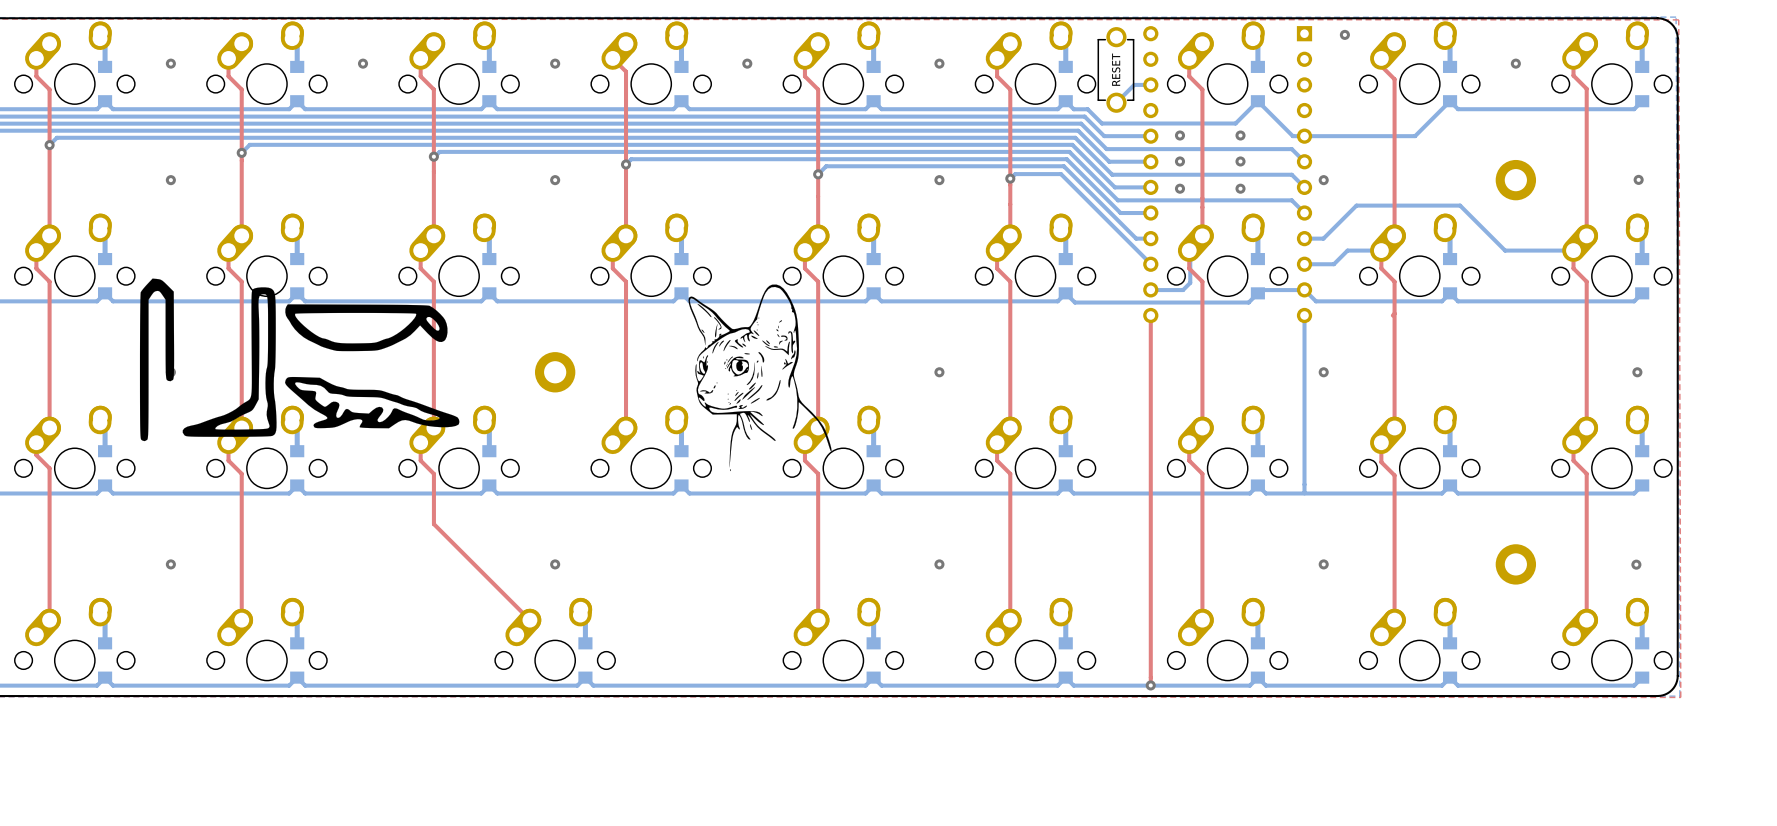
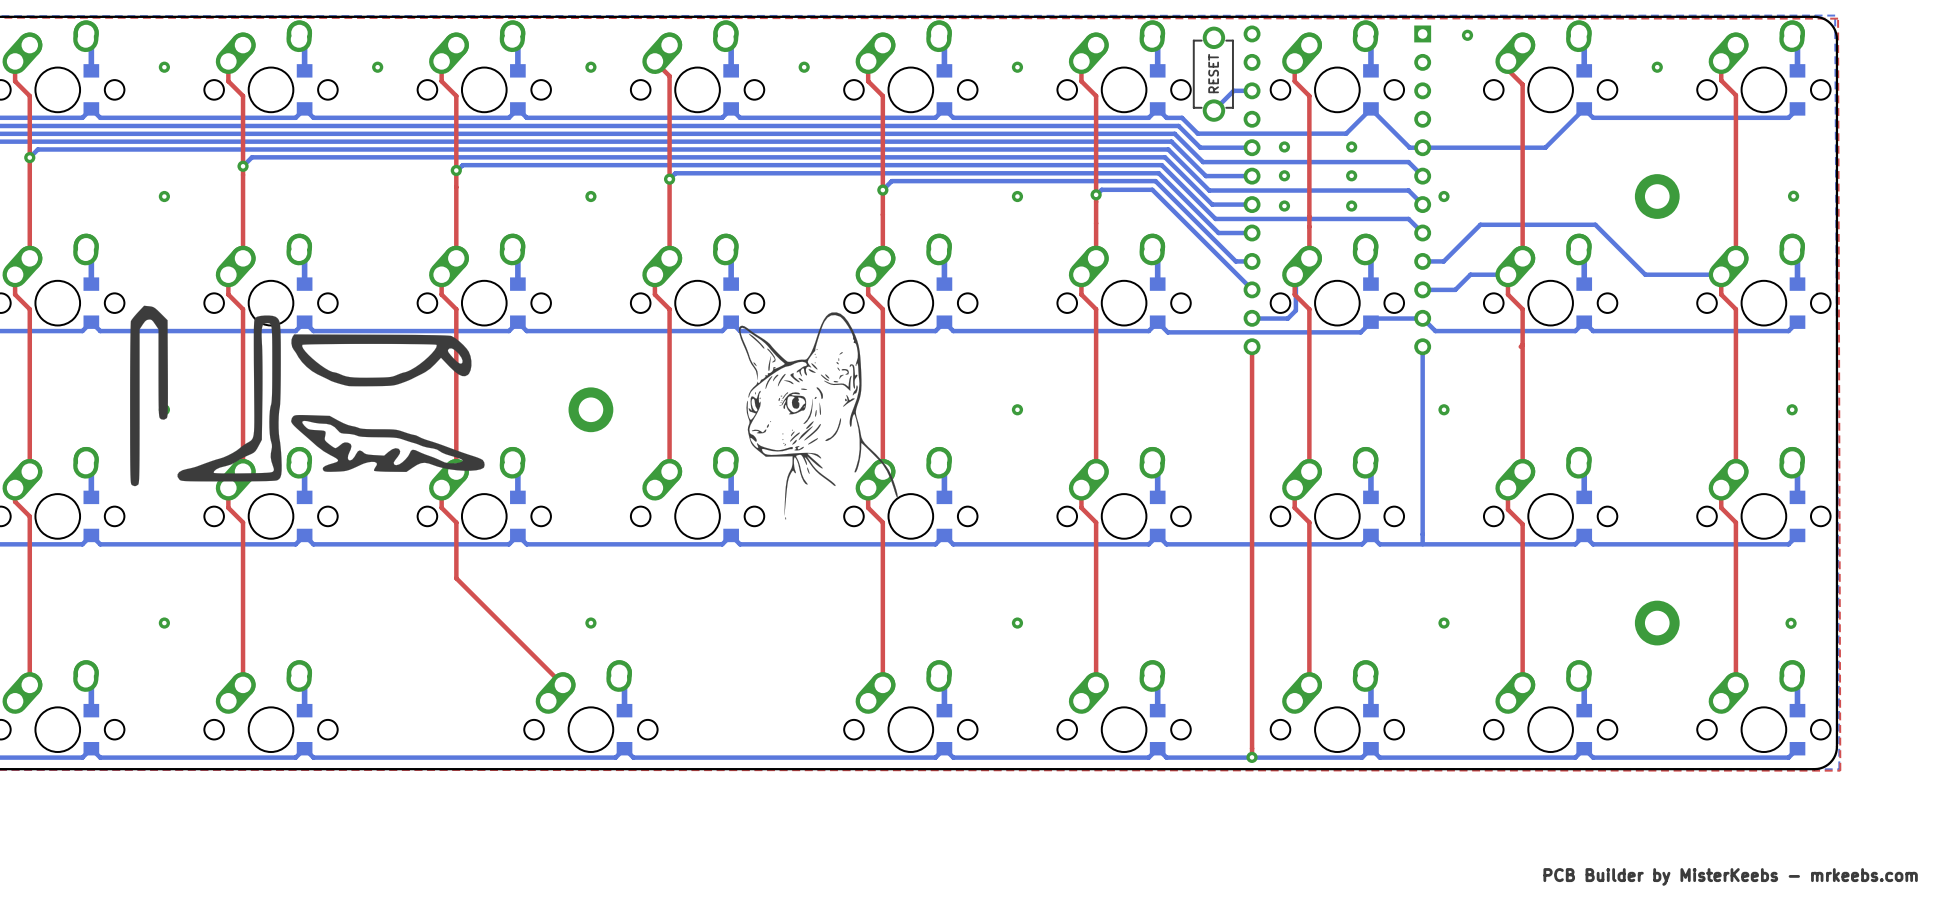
text: none -> PCB Builder by MisterKeebs - mrkeebs.com (1730, 876)

